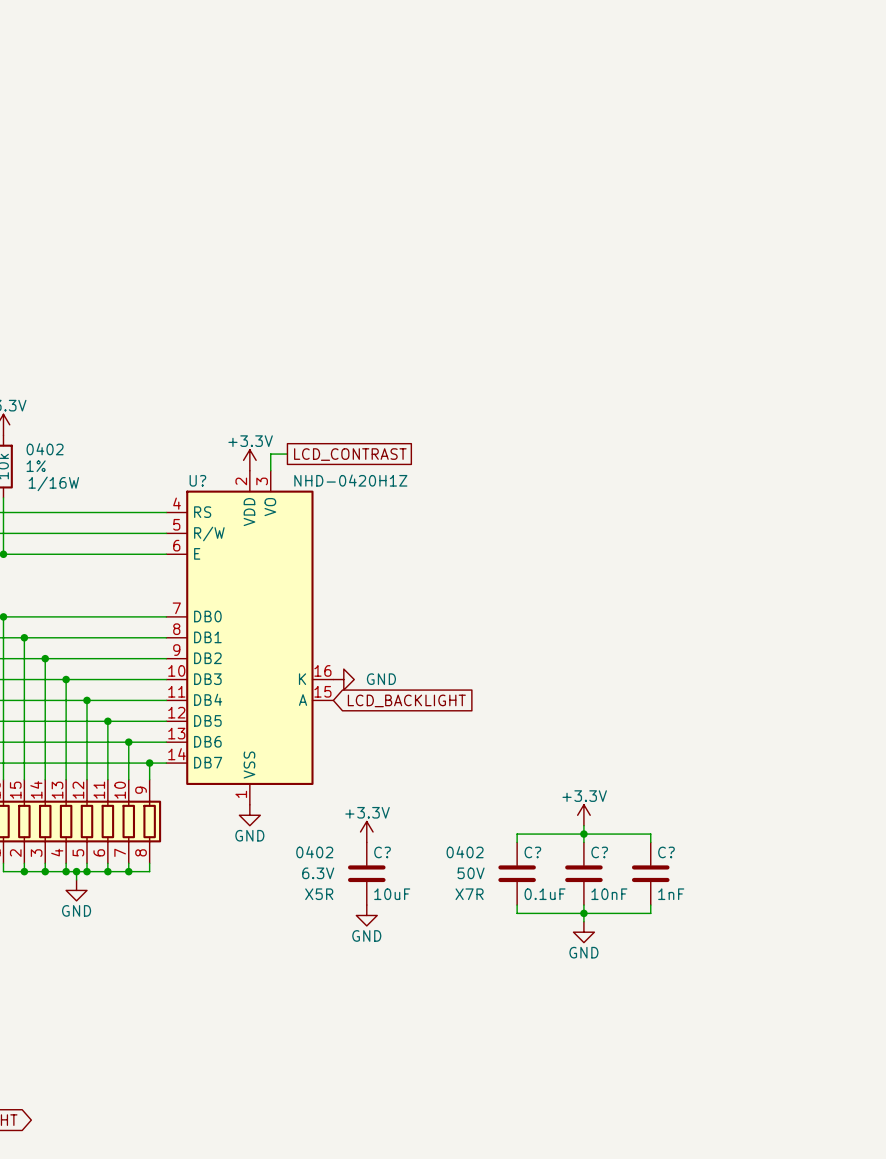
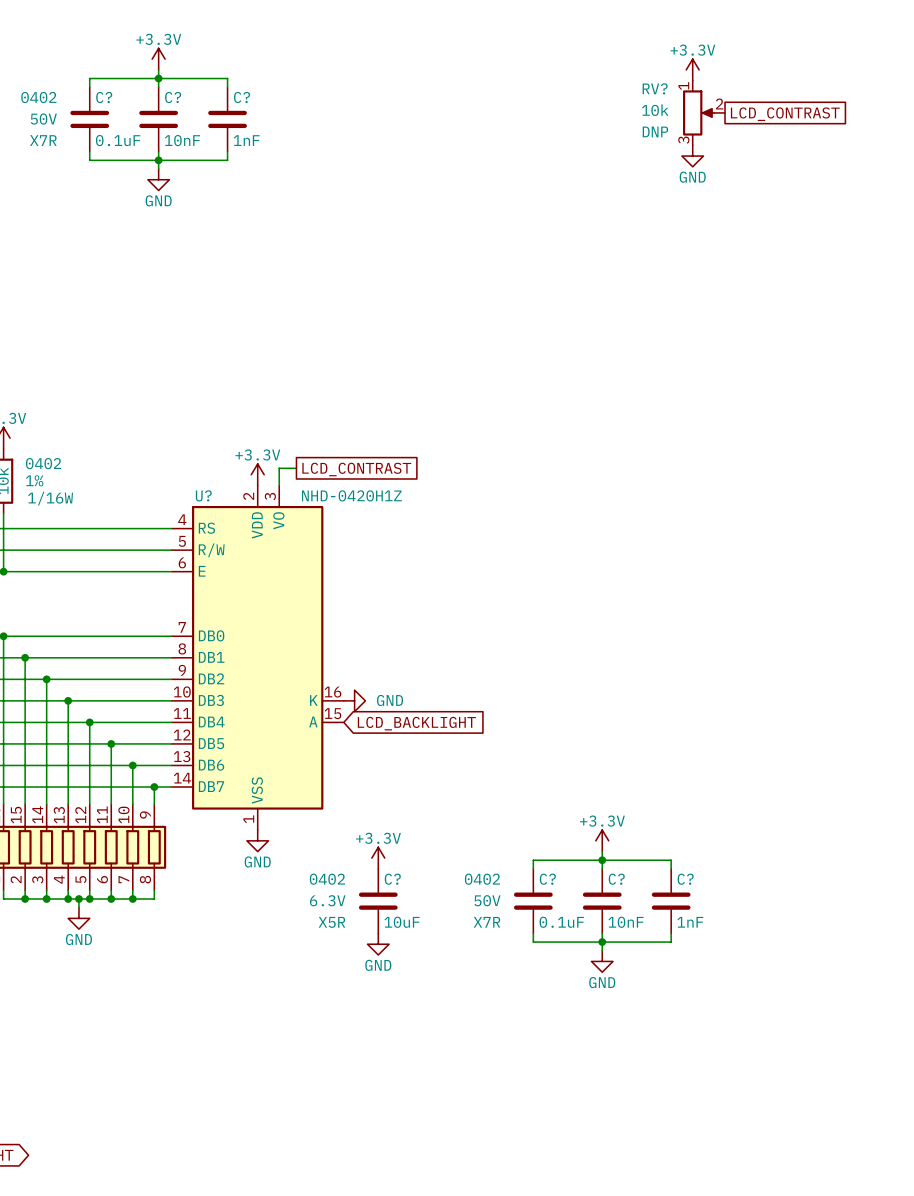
power symbol: none -> +3.3V (158, 59)
wire: none -> (158, 69) (158, 87)
power symbol: none -> +3.3V (692, 69)
junction: none -> (158, 78)
wire: none -> (89, 87) (89, 78) (227, 78) (227, 87)
RV?: none -> 10k (704, 112)
global label: none -> LCD_CONTRAST (785, 114)
C?: none -> 0.1uF (89, 119)
C?: none -> 10nF (158, 119)
C?: none -> 1nF (227, 119)
wire: none -> (89, 151) (89, 160) (227, 160) (227, 151)
wire: none -> (158, 151) (158, 168)
power symbol: none -> GND (692, 156)
junction: none -> (158, 160)
power symbol: none -> GND (158, 179)

